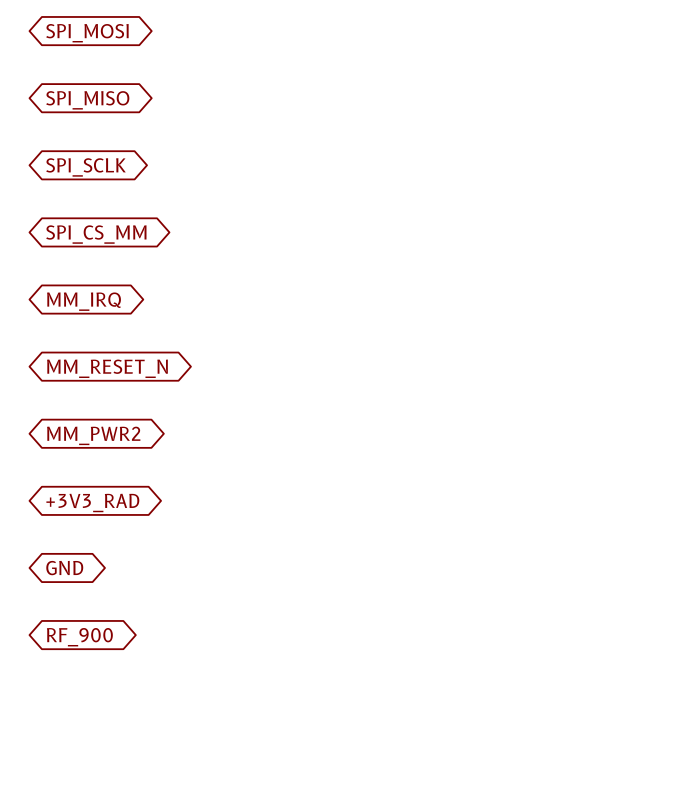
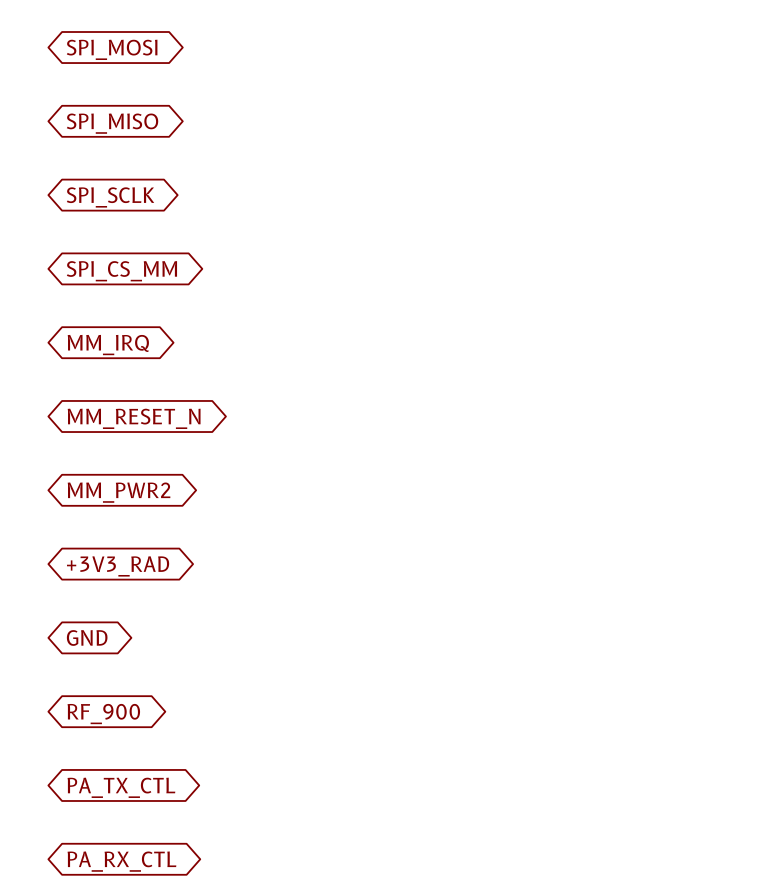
global label: none -> PA_TX_CTL (121, 787)
global label: none -> PA_RX_CTL (121, 861)

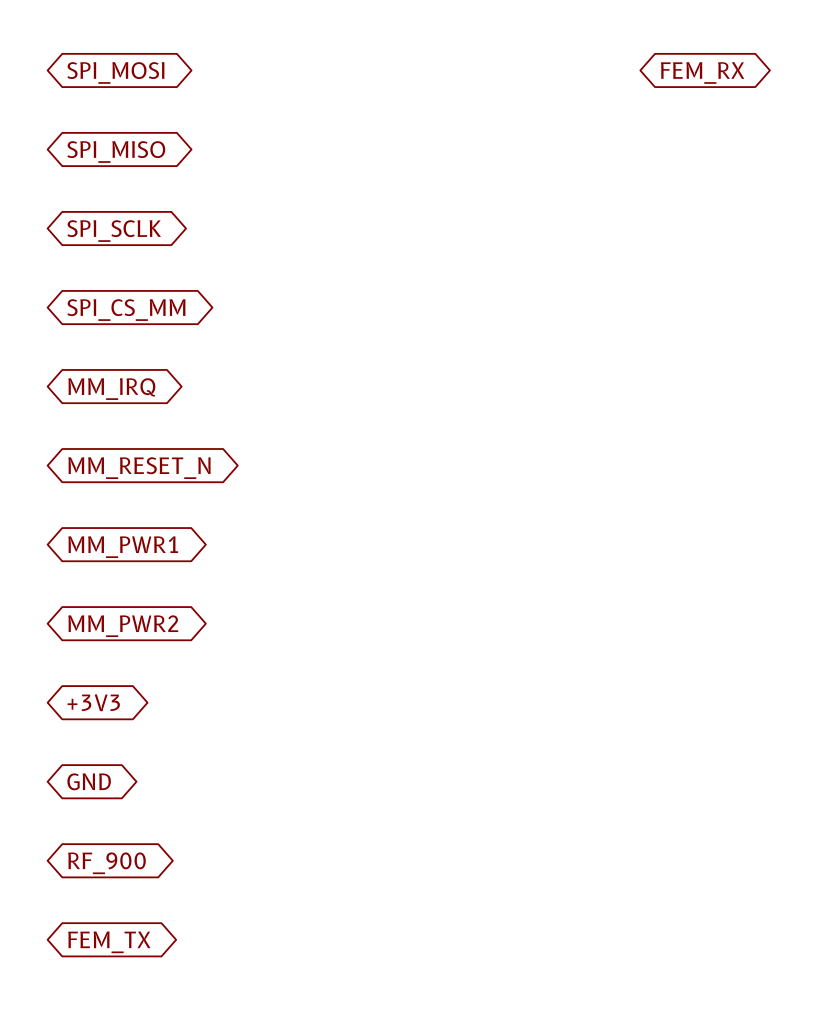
global label: none -> FEM_RX (702, 72)
global label: MM_PWR2 (119, 492) -> MM_PWR1 (123, 547)
global label: +3V3_RAD (118, 566) -> MM_PWR2 (123, 626)
global label: GND (87, 637) -> +3V3 (93, 702)
global label: RF_900 (103, 714) -> GND (89, 781)
global label: PA_TX_CTL (121, 787) -> RF_900 (106, 863)
global label: PA_RX_CTL (121, 861) -> FEM_TX (109, 942)

